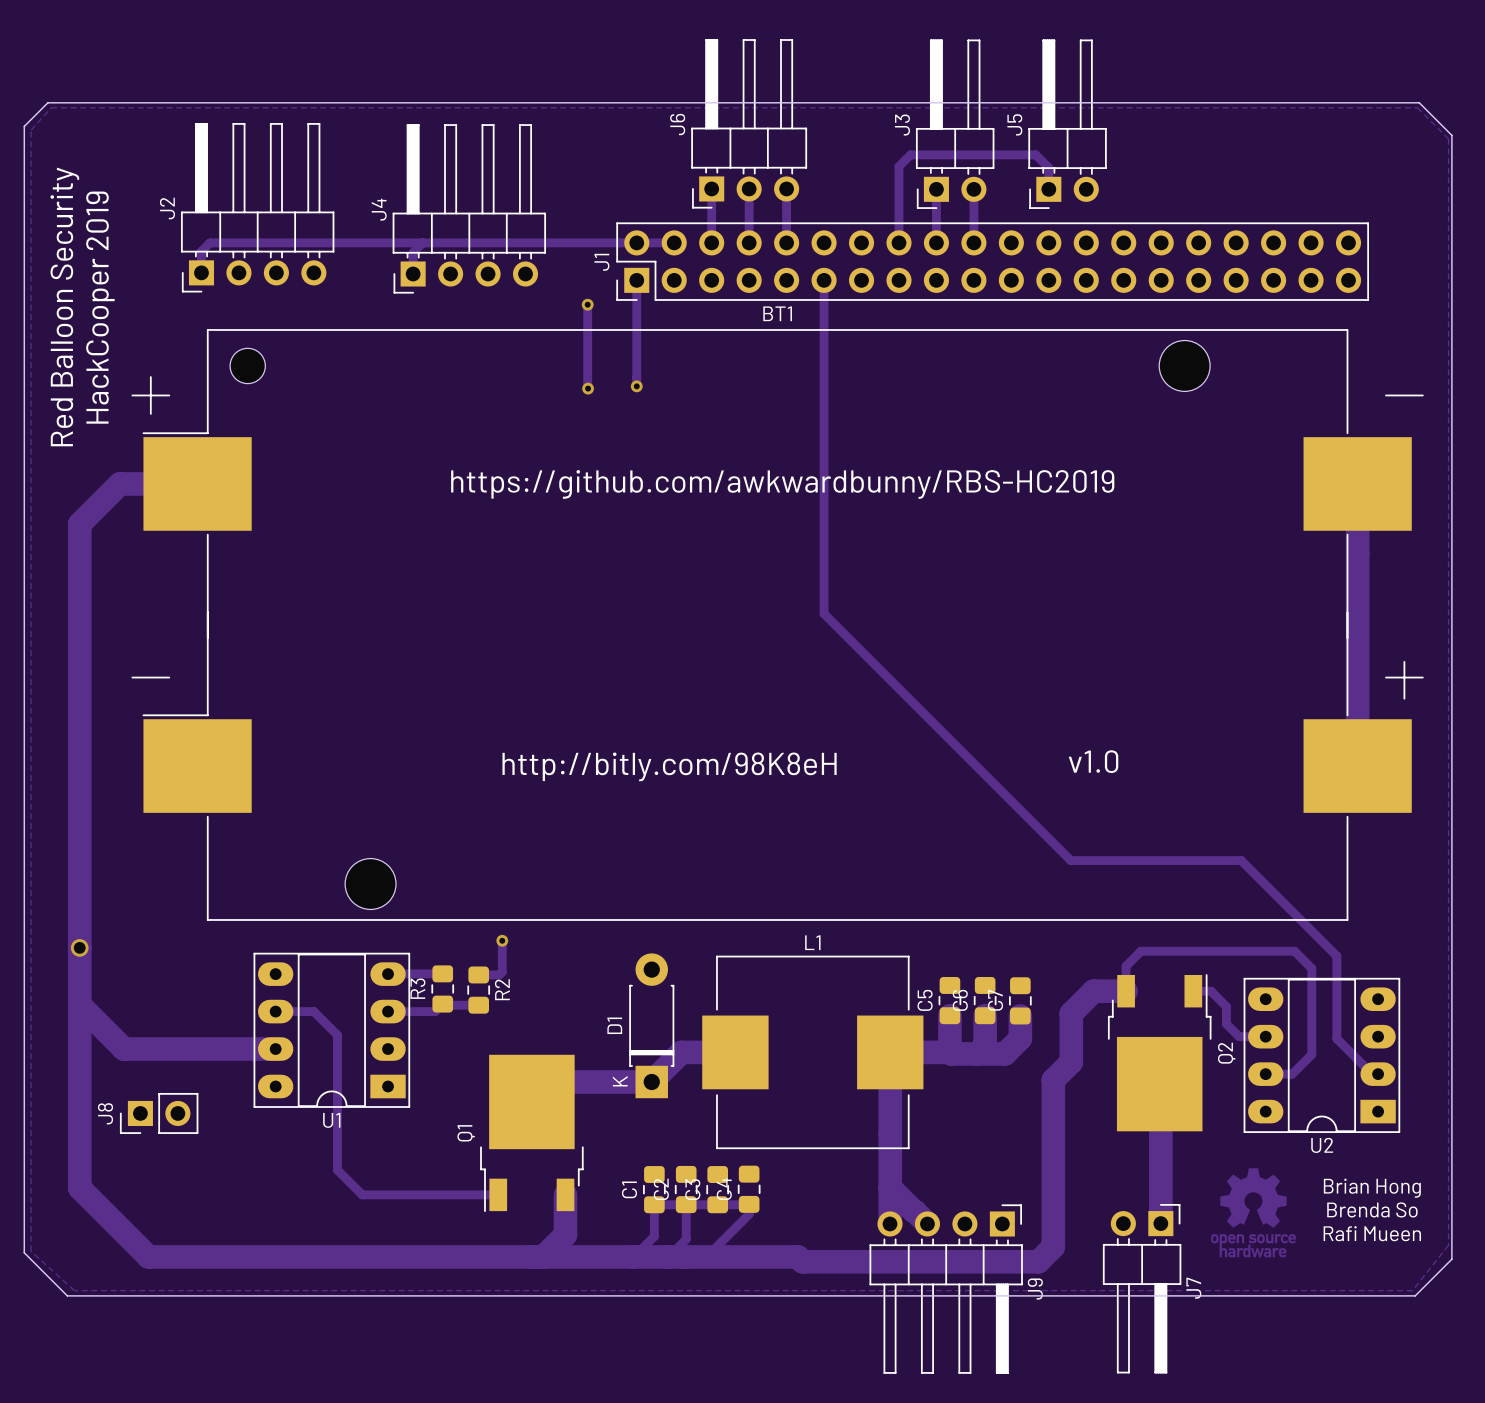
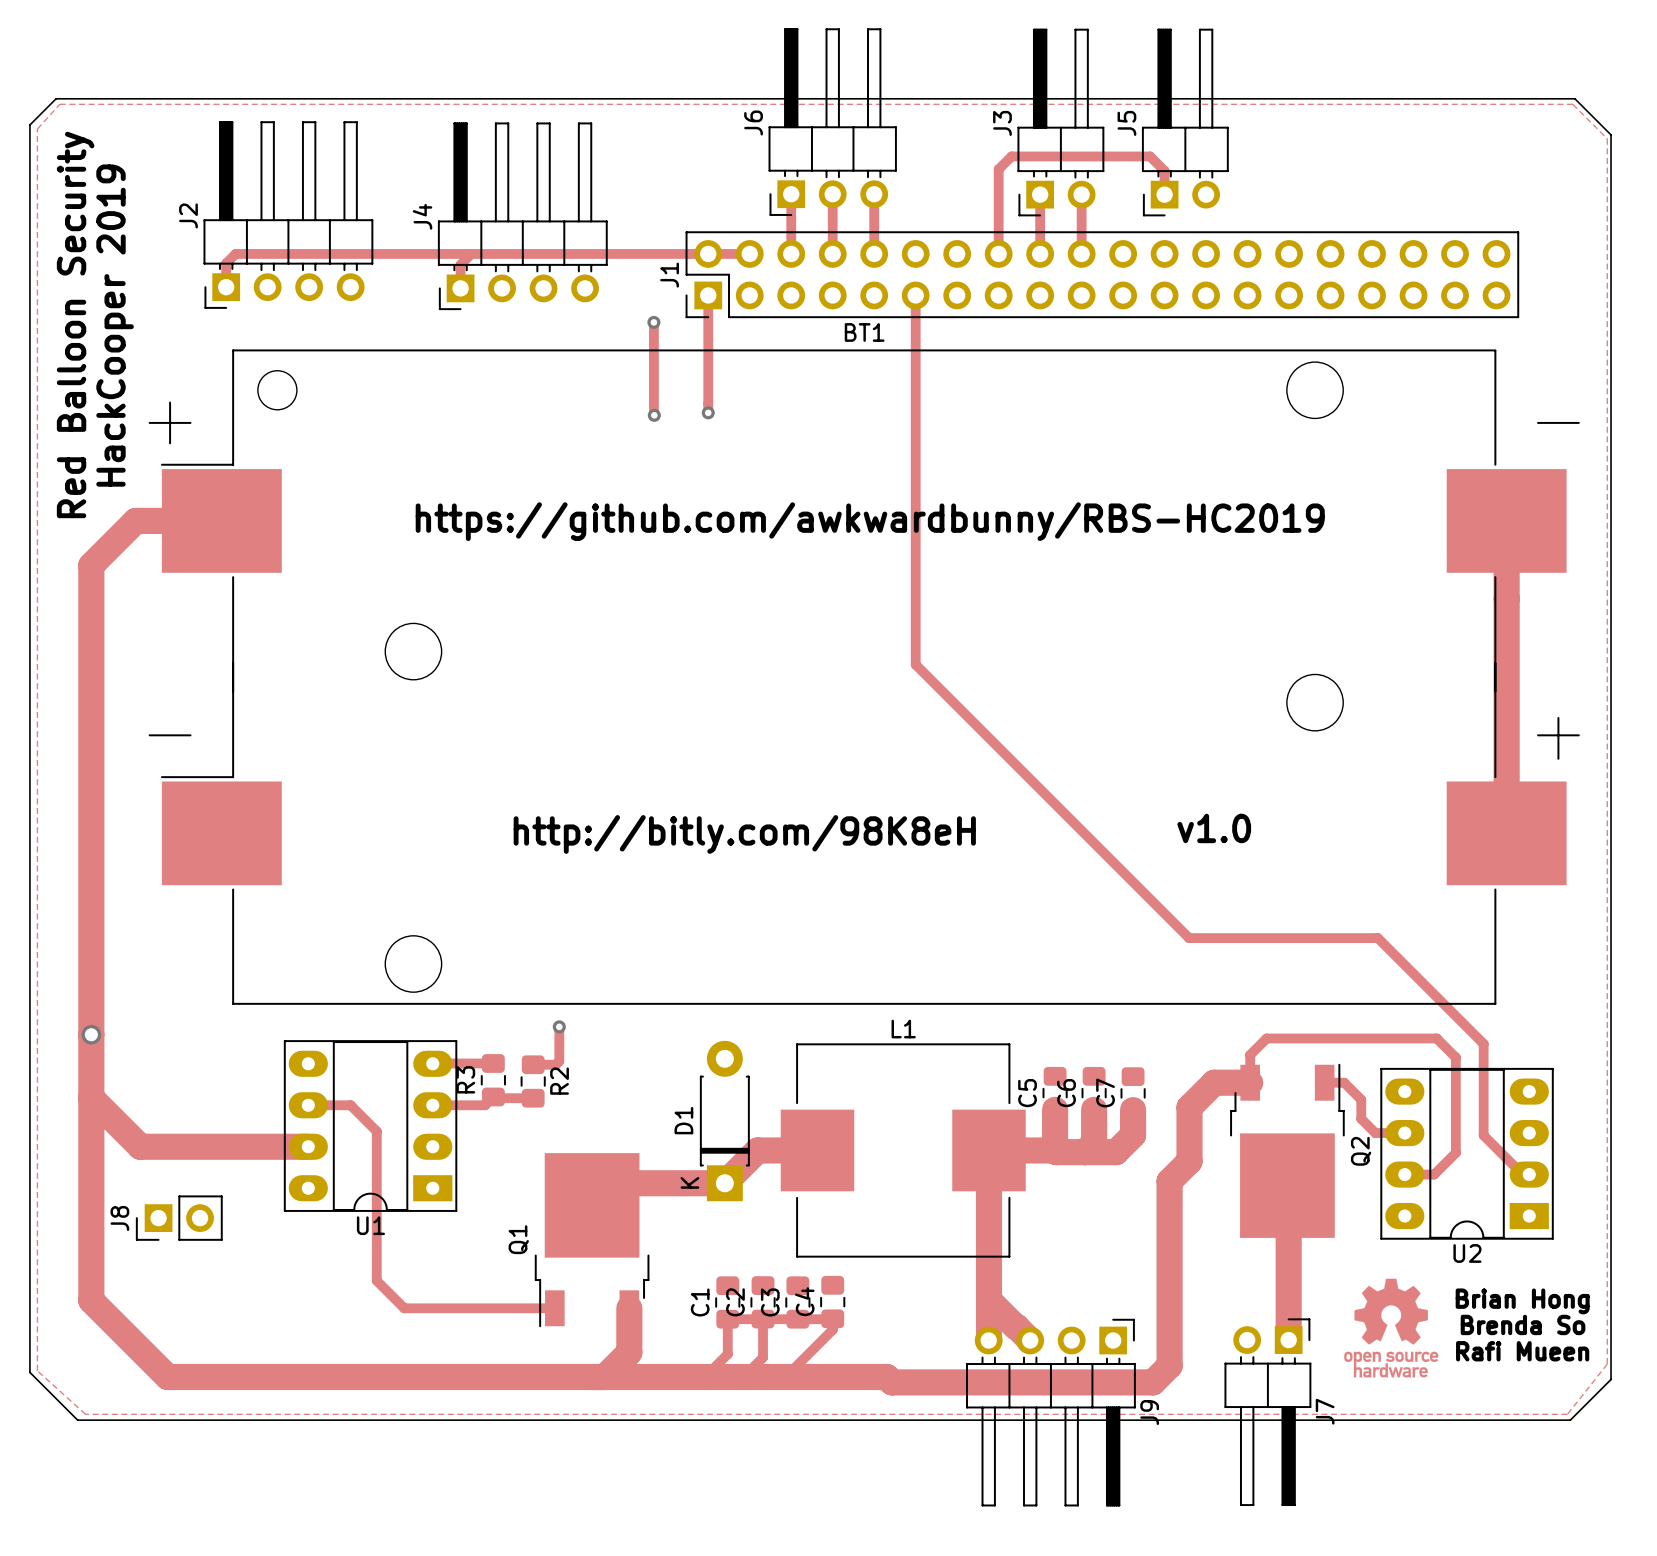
BT1 footprint: [131, 329, 1424, 921] -> [148, 349, 1580, 1005]

